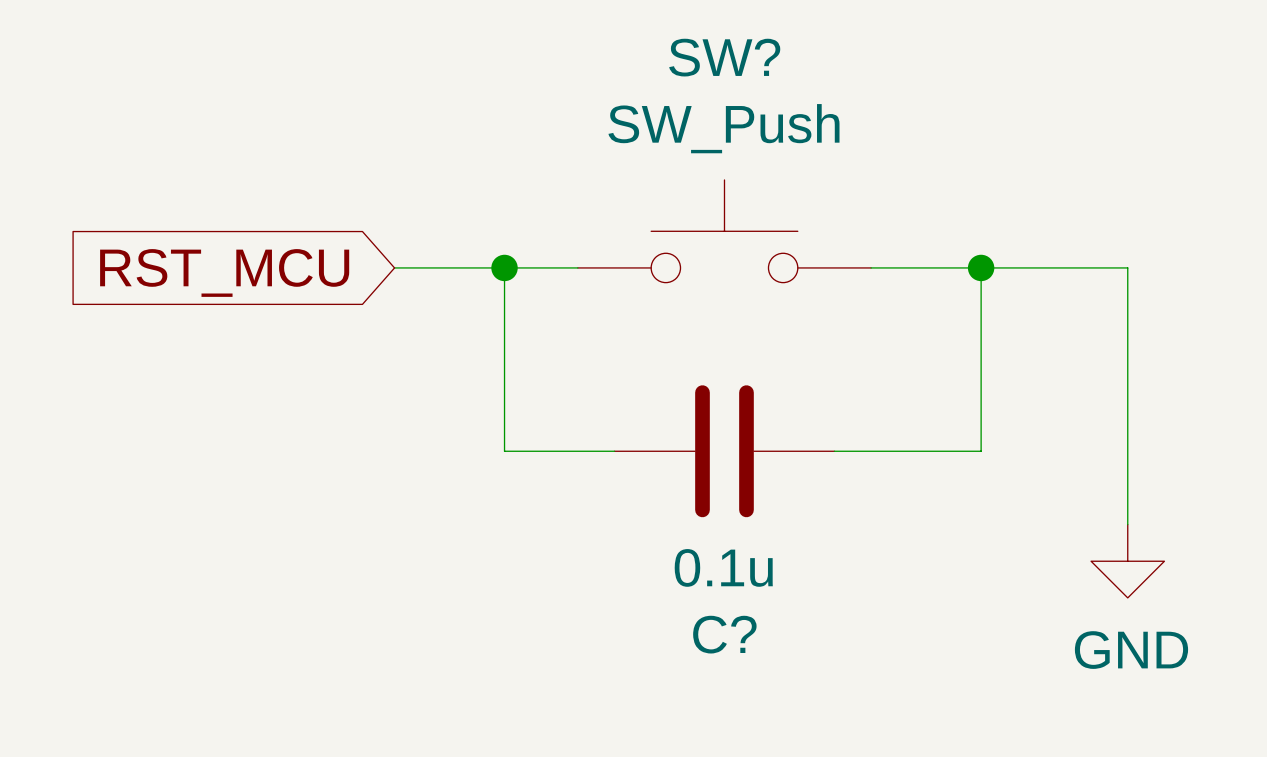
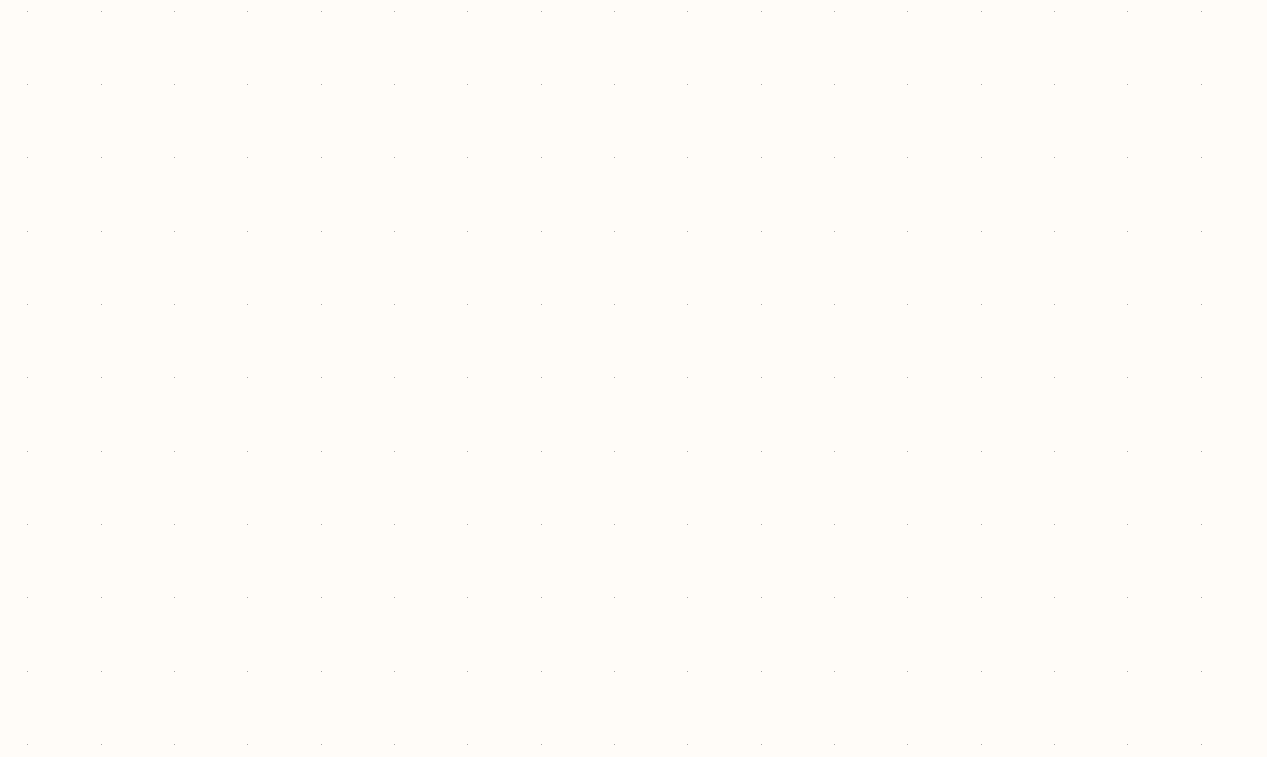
SW?: SW_Push (724, 231) -> none
wire: (394, 267) (577, 267) -> none
wire: (504, 267) (504, 451) (614, 451) -> none
junction: (504, 267) -> none
wire: (871, 267) (1127, 267) (1127, 524) -> none
wire: (981, 267) (981, 451) (834, 451) -> none
junction: (981, 267) -> none
global label: RST_MCU (224, 272) -> none
C?: 0.1u (724, 451) -> none
power symbol: GND (1127, 561) -> none

